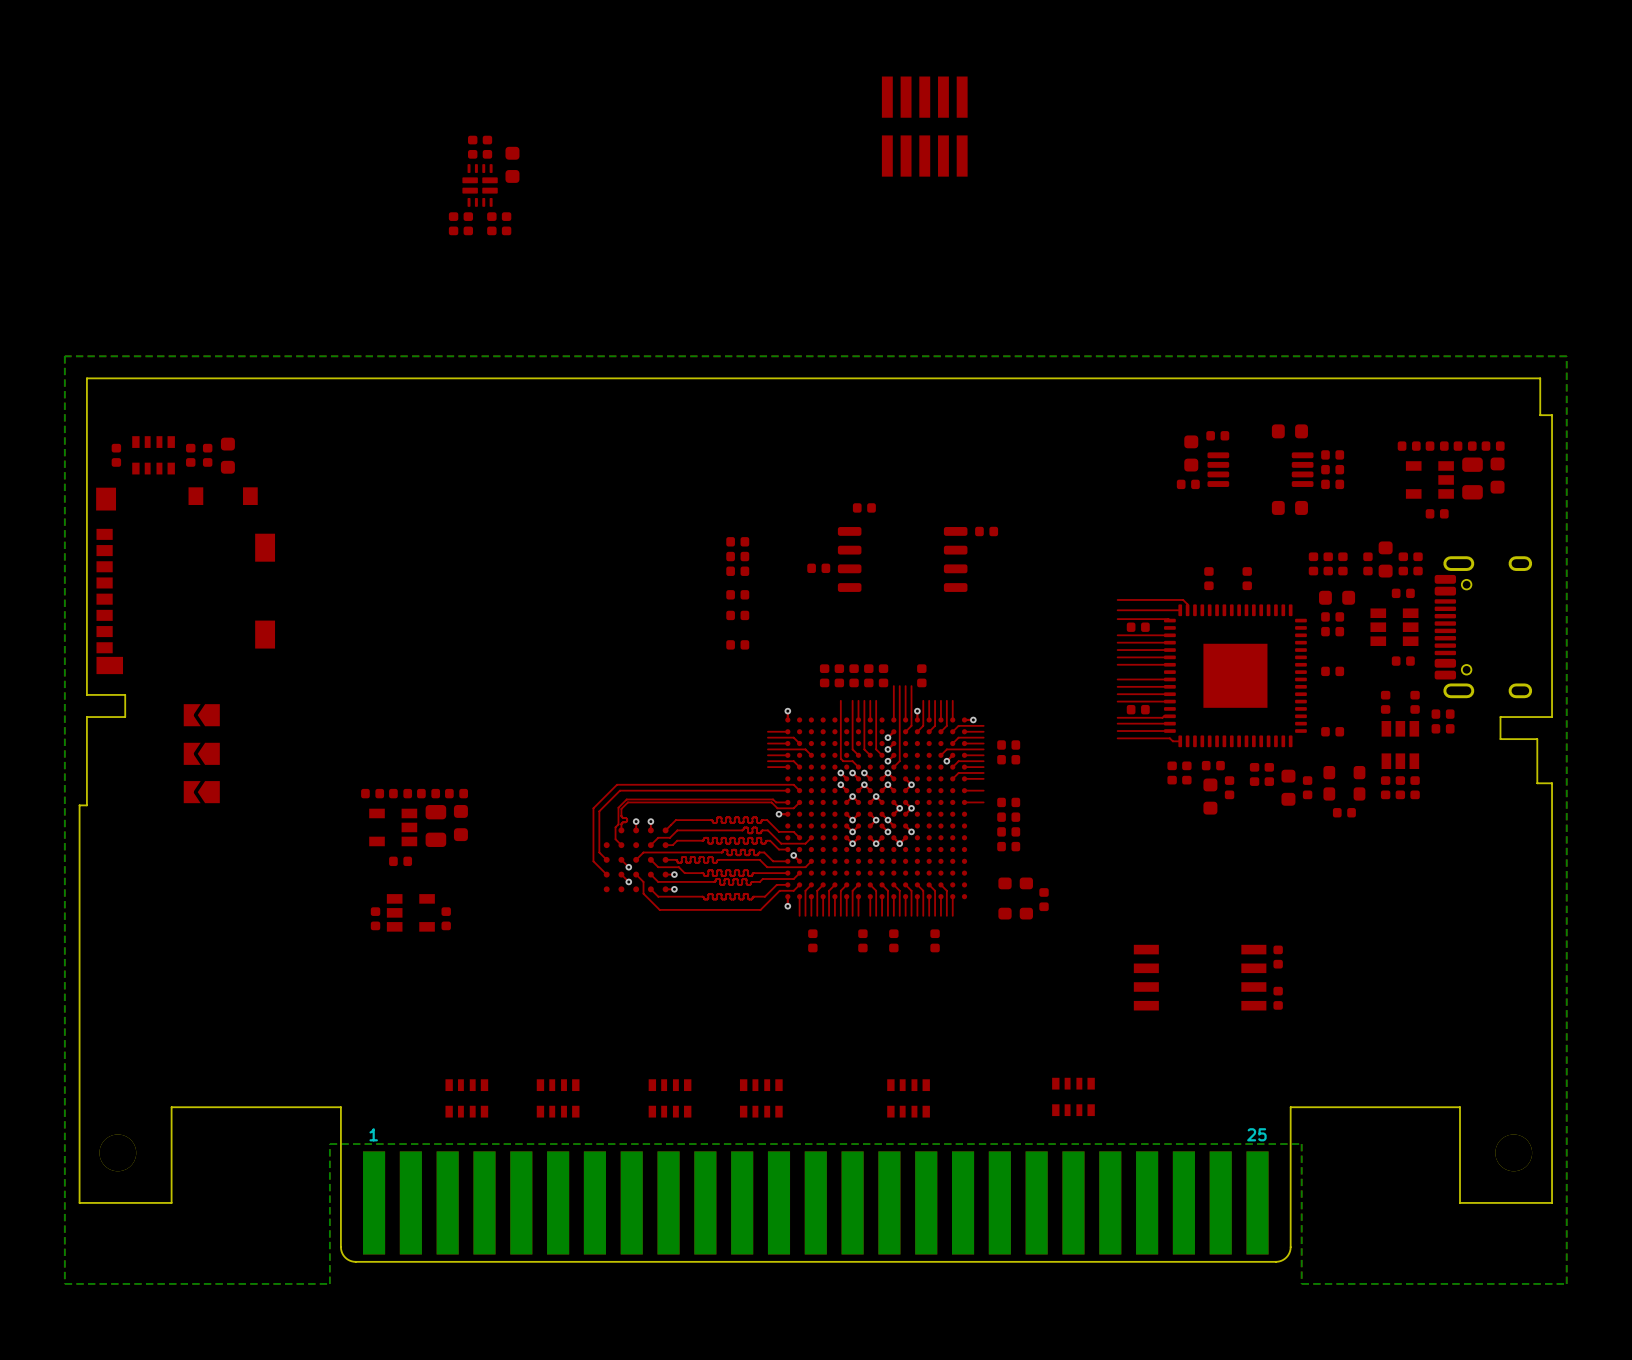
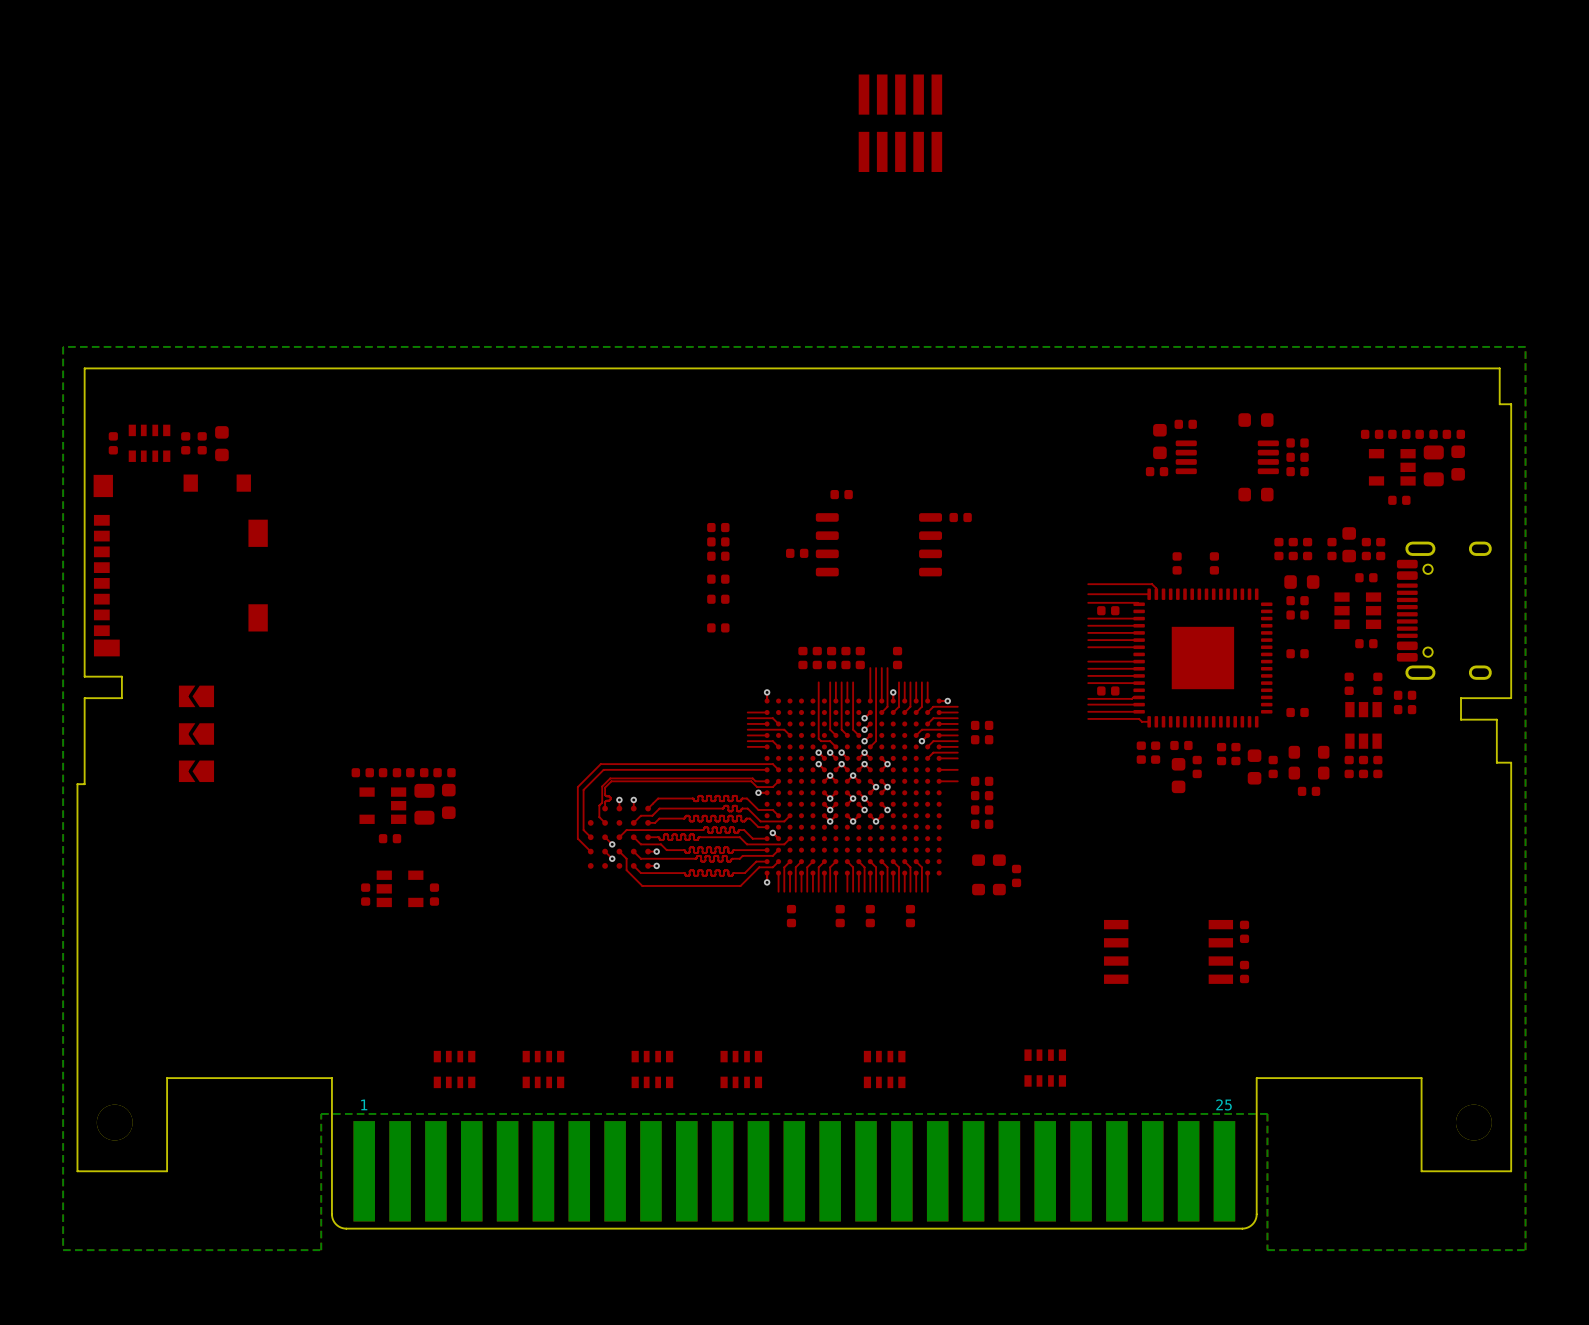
part: (472, 147) -> none
part: (487, 147) -> none
part: (512, 164) -> none
part: (480, 185) -> none
part: (453, 223) -> none
part: (468, 223) -> none
part: (491, 223) -> none
part: (506, 223) -> none

